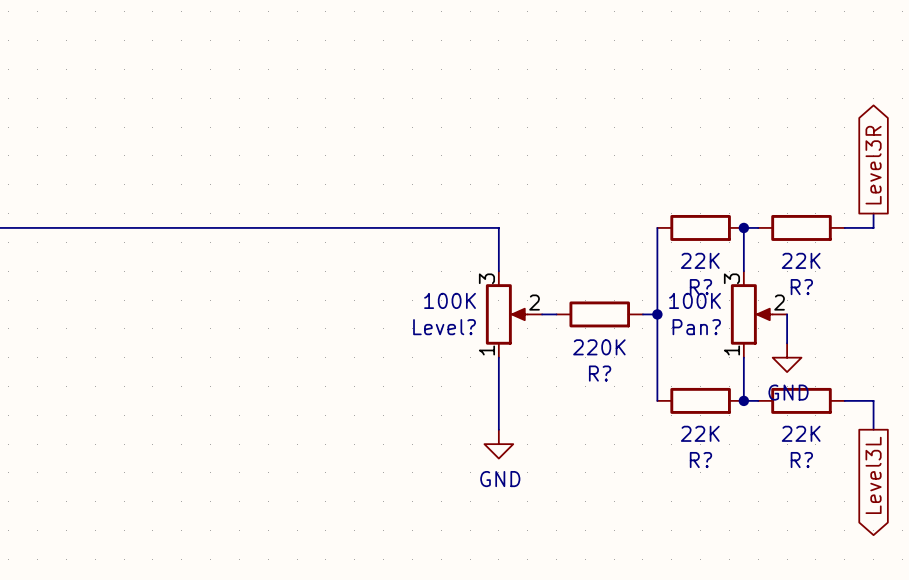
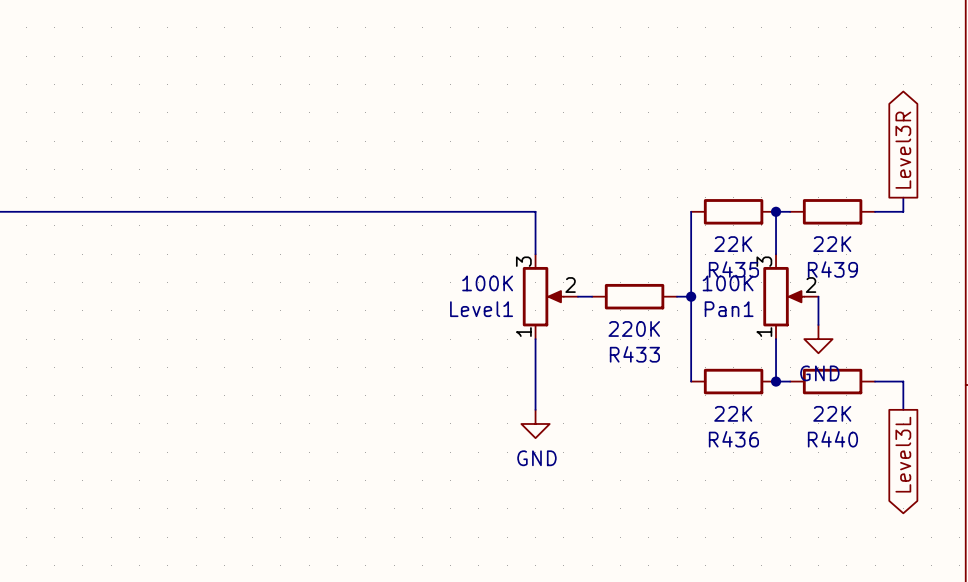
R? name: R? (700, 287) -> R435 (733, 269)
R? name: R? (801, 287) -> R439 (832, 269)
Level? name: Level? (444, 327) -> Level1 (481, 309)
Pan? name: Pan? (696, 327) -> Pan1 (729, 309)
R? name: R? (600, 373) -> R433 (634, 354)
R? name: R? (700, 460) -> R436 (733, 439)
R? name: R? (801, 460) -> R440 (832, 439)

